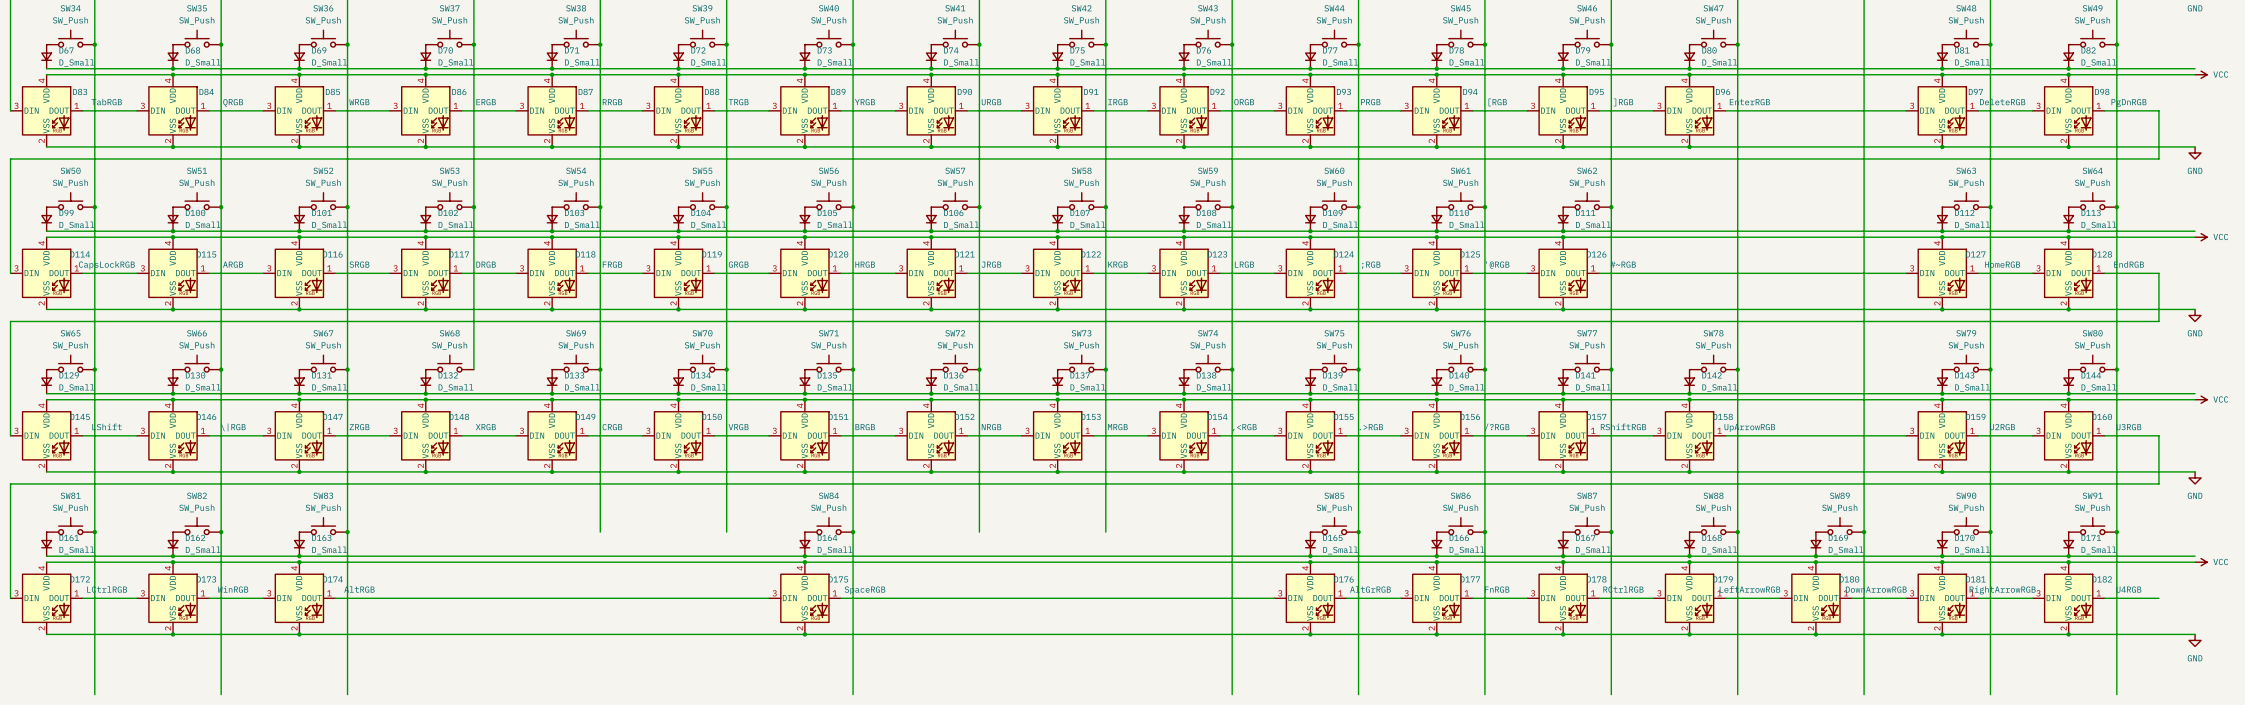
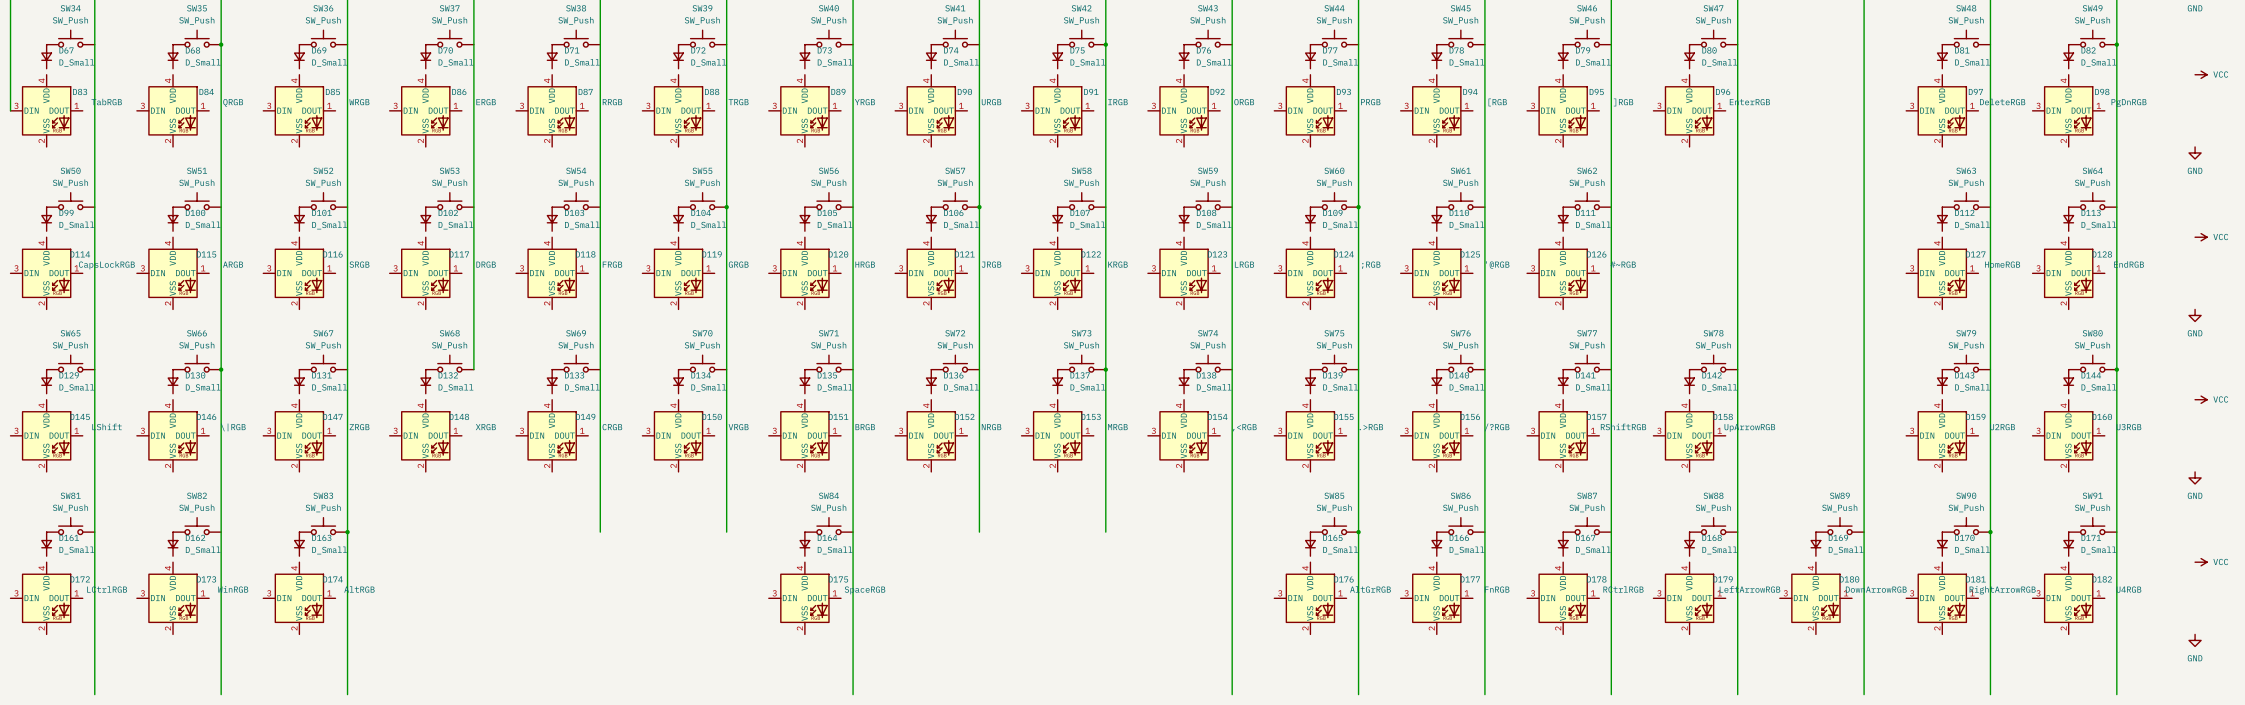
junction: (94, 44) -> none
junction: (347, 44) -> none
junction: (473, 44) -> none
junction: (600, 44) -> none
junction: (726, 44) -> none
junction: (853, 44) -> none
junction: (979, 44) -> none
junction: (1232, 44) -> none
junction: (1358, 44) -> none
junction: (1484, 44) -> none
junction: (1611, 44) -> none
junction: (1737, 44) -> none
junction: (1990, 44) -> none
wire: (46, 68) (2195, 68) -> none
junction: (173, 68) -> none
junction: (299, 68) -> none
junction: (425, 68) -> none
junction: (552, 68) -> none
junction: (678, 68) -> none
junction: (804, 68) -> none
junction: (931, 68) -> none
junction: (1057, 68) -> none
junction: (1184, 68) -> none
junction: (1310, 68) -> none
junction: (1436, 68) -> none
junction: (1563, 68) -> none
junction: (1689, 68) -> none
junction: (1942, 68) -> none
junction: (2068, 68) -> none
wire: (46, 74) (2195, 74) -> none
junction: (173, 74) -> none
junction: (299, 74) -> none
junction: (425, 74) -> none
junction: (552, 74) -> none
junction: (678, 74) -> none
junction: (804, 74) -> none
junction: (931, 74) -> none
junction: (1057, 74) -> none
junction: (1184, 74) -> none
junction: (1310, 74) -> none
junction: (1436, 74) -> none
junction: (1563, 74) -> none
junction: (1689, 74) -> none
junction: (1942, 74) -> none
junction: (2068, 74) -> none
wire: (82, 110) (136, 110) -> none
wire: (209, 110) (263, 110) -> none
wire: (335, 110) (389, 110) -> none
wire: (461, 110) (516, 110) -> none
wire: (588, 110) (642, 110) -> none
wire: (714, 110) (768, 110) -> none
wire: (841, 110) (895, 110) -> none
wire: (967, 110) (1021, 110) -> none
wire: (1093, 110) (1147, 110) -> none
wire: (1220, 110) (1274, 110) -> none
wire: (1346, 110) (1400, 110) -> none
wire: (1472, 110) (1527, 110) -> none
wire: (1599, 110) (1653, 110) -> none
wire: (1725, 110) (1906, 110) -> none
wire: (1978, 110) (2032, 110) -> none
wire: (2104, 110) (2158, 110) (2158, 158) (10, 158) (10, 273) -> none
wire: (46, 146) (2195, 146) -> none
junction: (173, 146) -> none
junction: (299, 146) -> none
junction: (425, 146) -> none
junction: (552, 146) -> none
junction: (678, 146) -> none
junction: (804, 146) -> none
junction: (931, 146) -> none
junction: (1057, 146) -> none
junction: (1184, 146) -> none
junction: (1310, 146) -> none
junction: (1436, 146) -> none
junction: (1563, 146) -> none
junction: (1689, 146) -> none
junction: (1942, 146) -> none
junction: (2068, 146) -> none
junction: (94, 207) -> none
junction: (221, 207) -> none
junction: (347, 207) -> none
junction: (473, 207) -> none
junction: (600, 207) -> none
junction: (853, 207) -> none
junction: (1105, 207) -> none
junction: (1232, 207) -> none
junction: (1484, 207) -> none
junction: (1611, 207) -> none
junction: (1990, 207) -> none
junction: (2116, 207) -> none
wire: (46, 231) (2195, 231) -> none
junction: (173, 231) -> none
junction: (299, 231) -> none
junction: (425, 231) -> none
junction: (552, 231) -> none
junction: (678, 231) -> none
junction: (804, 231) -> none
junction: (931, 231) -> none
junction: (1057, 231) -> none
junction: (1184, 231) -> none
junction: (1310, 231) -> none
junction: (1436, 231) -> none
junction: (1563, 231) -> none
junction: (1942, 231) -> none
junction: (2068, 231) -> none
wire: (46, 237) (2195, 237) -> none
junction: (173, 237) -> none
junction: (299, 237) -> none
junction: (425, 237) -> none
junction: (552, 237) -> none
junction: (678, 237) -> none
junction: (804, 237) -> none
junction: (931, 237) -> none
junction: (1057, 237) -> none
junction: (1184, 237) -> none
junction: (1310, 237) -> none
junction: (1436, 237) -> none
junction: (1563, 237) -> none
junction: (1942, 237) -> none
junction: (2068, 237) -> none
wire: (82, 273) (136, 273) -> none
wire: (209, 273) (263, 273) -> none
wire: (335, 273) (389, 273) -> none
wire: (461, 273) (516, 273) -> none
wire: (588, 273) (642, 273) -> none
wire: (714, 273) (768, 273) -> none
wire: (841, 273) (895, 273) -> none
wire: (967, 273) (1021, 273) -> none
wire: (1093, 273) (1147, 273) -> none
wire: (1220, 273) (1274, 273) -> none
wire: (1346, 273) (1400, 273) -> none
wire: (1472, 273) (1527, 273) -> none
wire: (1599, 273) (1906, 273) -> none
wire: (1978, 273) (2032, 273) -> none
wire: (2104, 273) (2158, 273) (2158, 321) (10, 321) (10, 435) -> none
wire: (46, 309) (2195, 309) -> none
junction: (173, 309) -> none
junction: (299, 309) -> none
junction: (425, 309) -> none
junction: (552, 309) -> none
junction: (678, 309) -> none
junction: (804, 309) -> none
junction: (931, 309) -> none
junction: (1057, 309) -> none
junction: (1184, 309) -> none
junction: (1310, 309) -> none
junction: (1436, 309) -> none
junction: (1563, 309) -> none
junction: (1942, 309) -> none
junction: (2068, 309) -> none
junction: (94, 369) -> none
junction: (347, 369) -> none
junction: (600, 369) -> none
junction: (726, 369) -> none
junction: (853, 369) -> none
junction: (979, 369) -> none
junction: (1232, 369) -> none
junction: (1358, 369) -> none
junction: (1484, 369) -> none
junction: (1611, 369) -> none
junction: (1737, 369) -> none
junction: (1990, 369) -> none
wire: (46, 393) (2195, 393) -> none
junction: (173, 393) -> none
junction: (299, 393) -> none
junction: (425, 393) -> none
junction: (552, 393) -> none
junction: (678, 393) -> none
junction: (804, 393) -> none
junction: (931, 393) -> none
junction: (1057, 393) -> none
junction: (1184, 393) -> none
junction: (1310, 393) -> none
junction: (1436, 393) -> none
junction: (1563, 393) -> none
junction: (1689, 393) -> none
junction: (1942, 393) -> none
junction: (2068, 393) -> none
wire: (46, 399) (2195, 399) -> none
junction: (173, 399) -> none
junction: (299, 399) -> none
junction: (425, 399) -> none
junction: (552, 399) -> none
junction: (678, 399) -> none
junction: (804, 399) -> none
junction: (931, 399) -> none
junction: (1057, 399) -> none
junction: (1184, 399) -> none
junction: (1310, 399) -> none
junction: (1436, 399) -> none
junction: (1563, 399) -> none
junction: (1689, 399) -> none
junction: (1942, 399) -> none
junction: (2068, 399) -> none
wire: (82, 435) (136, 435) -> none
wire: (209, 435) (263, 435) -> none
wire: (335, 435) (389, 435) -> none
wire: (461, 435) (516, 435) -> none
wire: (588, 435) (642, 435) -> none
wire: (714, 435) (768, 435) -> none
wire: (841, 435) (895, 435) -> none
wire: (967, 435) (1021, 435) -> none
wire: (1093, 435) (1147, 435) -> none
wire: (1220, 435) (1274, 435) -> none
wire: (1346, 435) (1400, 435) -> none
wire: (1472, 435) (1527, 435) -> none
wire: (1599, 435) (1653, 435) -> none
wire: (1725, 435) (1906, 435) -> none
wire: (1978, 435) (2032, 435) -> none
wire: (2104, 435) (2158, 435) (2158, 483) (10, 483) (10, 598) -> none
wire: (46, 471) (2195, 471) -> none
junction: (173, 471) -> none
junction: (299, 471) -> none
junction: (425, 471) -> none
junction: (552, 471) -> none
junction: (678, 471) -> none
junction: (804, 471) -> none
junction: (931, 471) -> none
junction: (1057, 471) -> none
junction: (1184, 471) -> none
junction: (1310, 471) -> none
junction: (1436, 471) -> none
junction: (1563, 471) -> none
junction: (1689, 471) -> none
junction: (1942, 471) -> none
junction: (2068, 471) -> none
junction: (94, 532) -> none
junction: (221, 532) -> none
junction: (853, 532) -> none
junction: (1484, 532) -> none
junction: (1611, 532) -> none
junction: (1737, 532) -> none
junction: (1864, 532) -> none
junction: (2116, 532) -> none
wire: (46, 556) (2195, 556) -> none
junction: (173, 556) -> none
junction: (299, 556) -> none
junction: (804, 556) -> none
junction: (1310, 556) -> none
junction: (1436, 556) -> none
junction: (1563, 556) -> none
junction: (1689, 556) -> none
junction: (1815, 556) -> none
junction: (1942, 556) -> none
junction: (2068, 556) -> none
wire: (46, 562) (2195, 562) -> none
junction: (173, 562) -> none
junction: (299, 562) -> none
junction: (804, 562) -> none
junction: (1310, 562) -> none
junction: (1436, 562) -> none
junction: (1563, 562) -> none
junction: (1689, 562) -> none
junction: (1815, 562) -> none
junction: (1942, 562) -> none
junction: (2068, 562) -> none
wire: (82, 598) (136, 598) -> none
wire: (209, 598) (263, 598) -> none
wire: (335, 598) (768, 598) -> none
wire: (841, 598) (1274, 598) -> none
wire: (1346, 598) (1400, 598) -> none
wire: (1472, 598) (1527, 598) -> none
wire: (1599, 598) (1653, 598) -> none
wire: (1725, 598) (1779, 598) -> none
wire: (1852, 598) (1906, 598) -> none
wire: (1978, 598) (2032, 598) -> none
wire: (2104, 598) (2158, 598) -> none
wire: (46, 634) (2195, 634) -> none
junction: (173, 634) -> none
junction: (299, 634) -> none
junction: (804, 634) -> none
junction: (1310, 634) -> none
junction: (1436, 634) -> none
junction: (1563, 634) -> none
junction: (1689, 634) -> none
junction: (1815, 634) -> none
junction: (1942, 634) -> none
junction: (2068, 634) -> none

